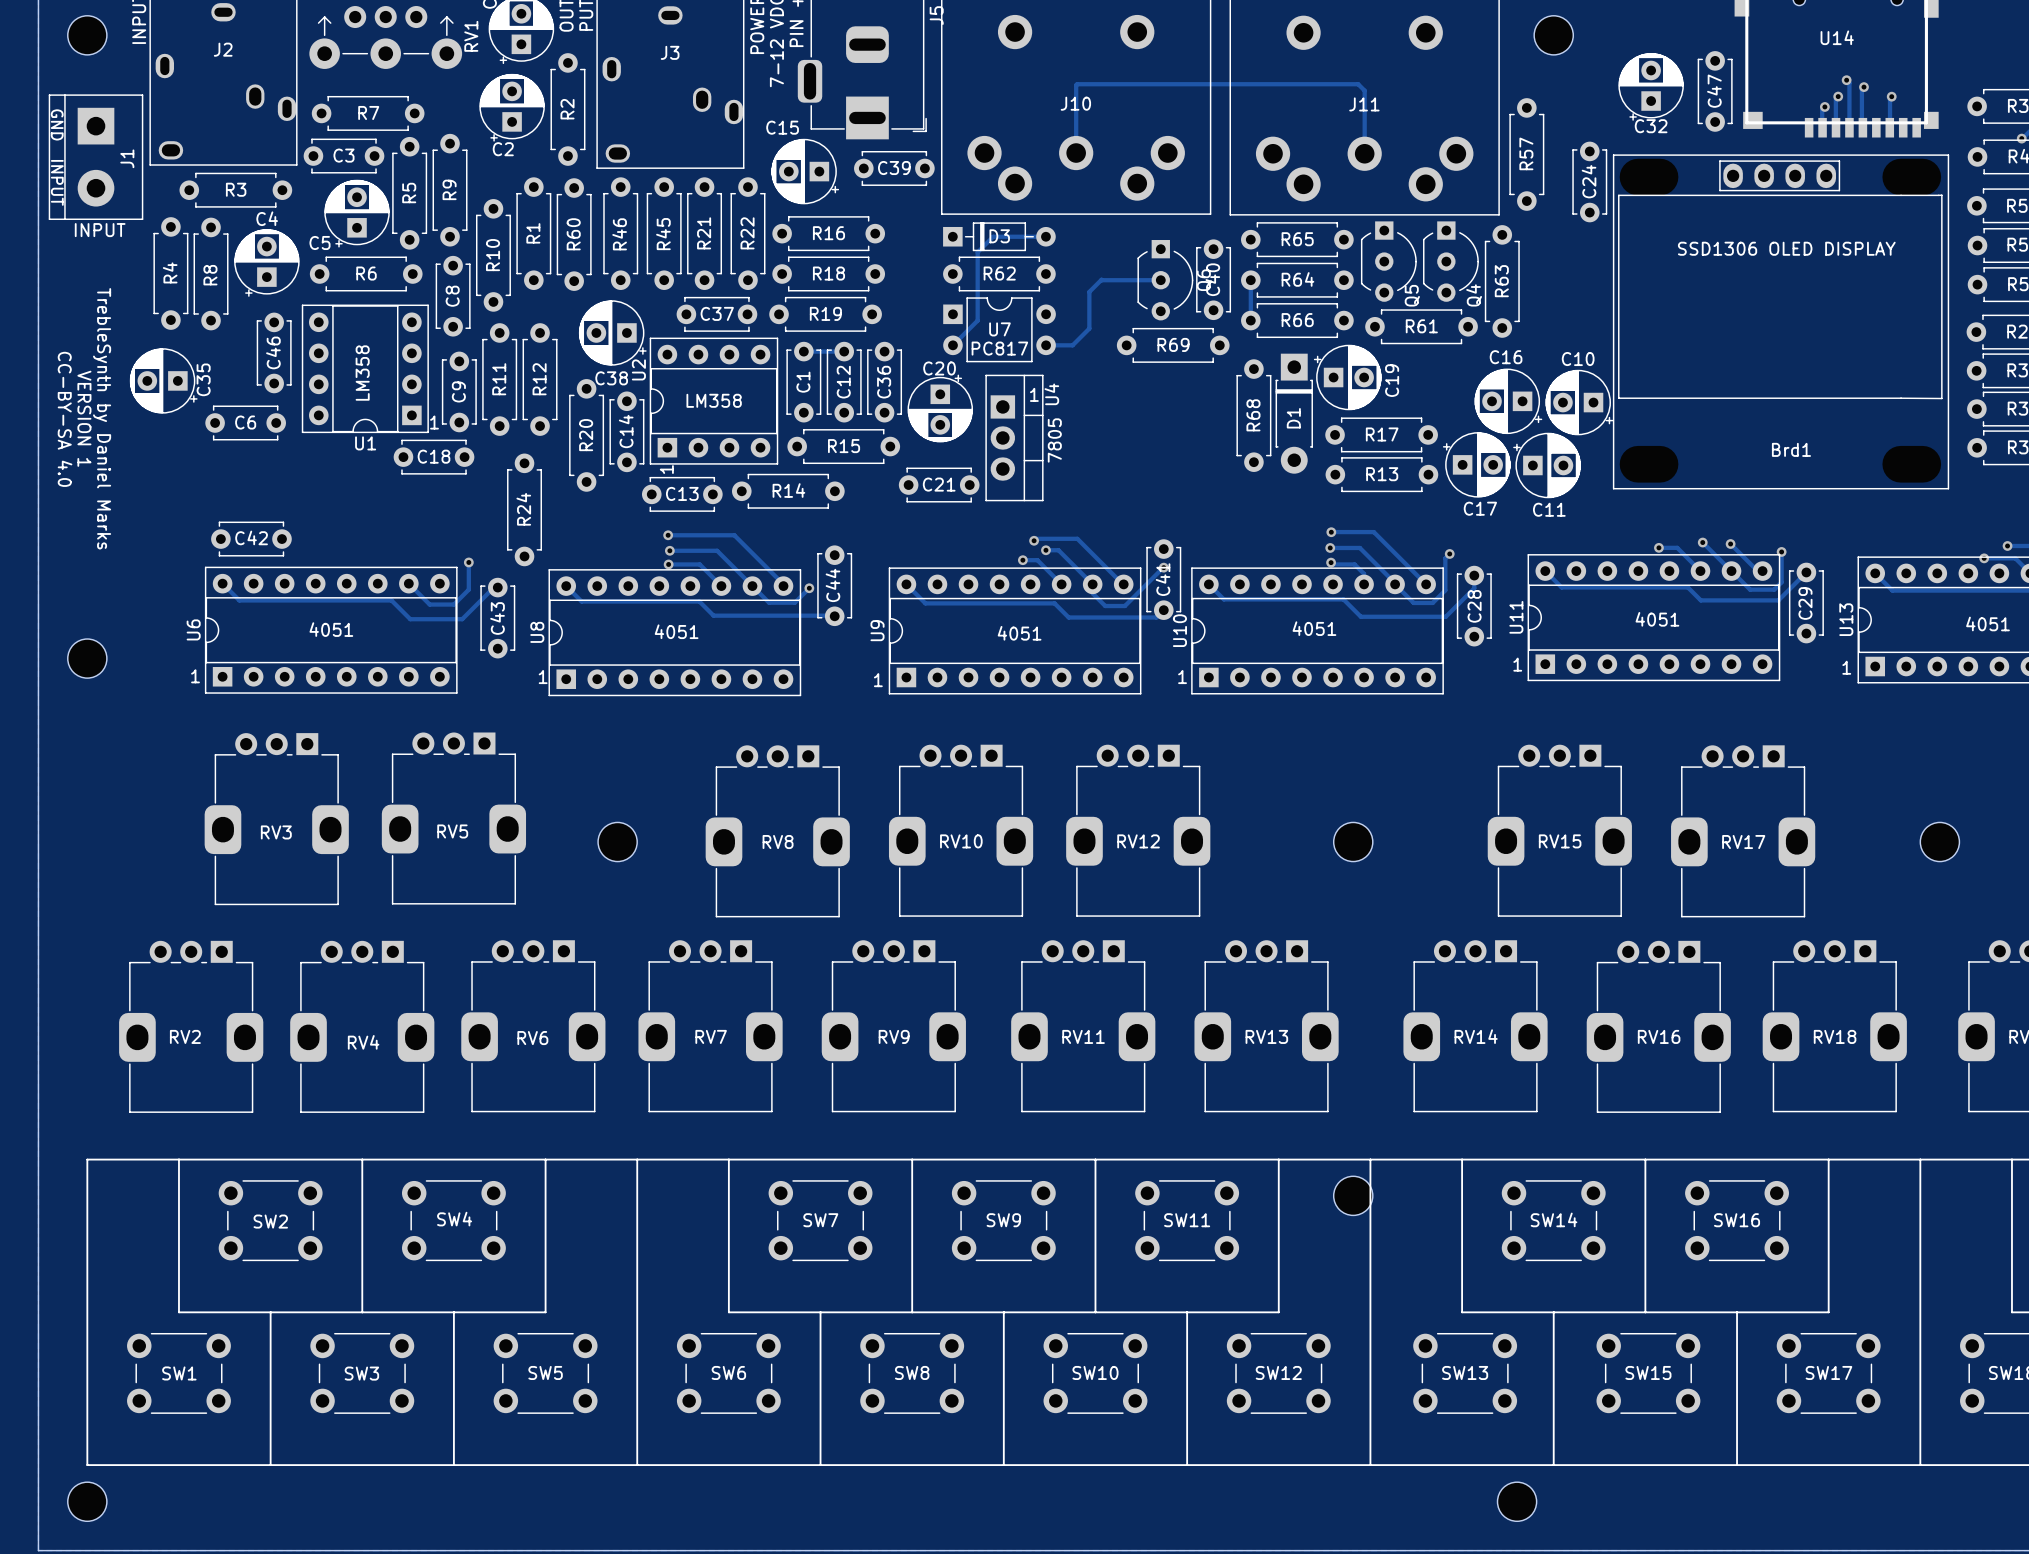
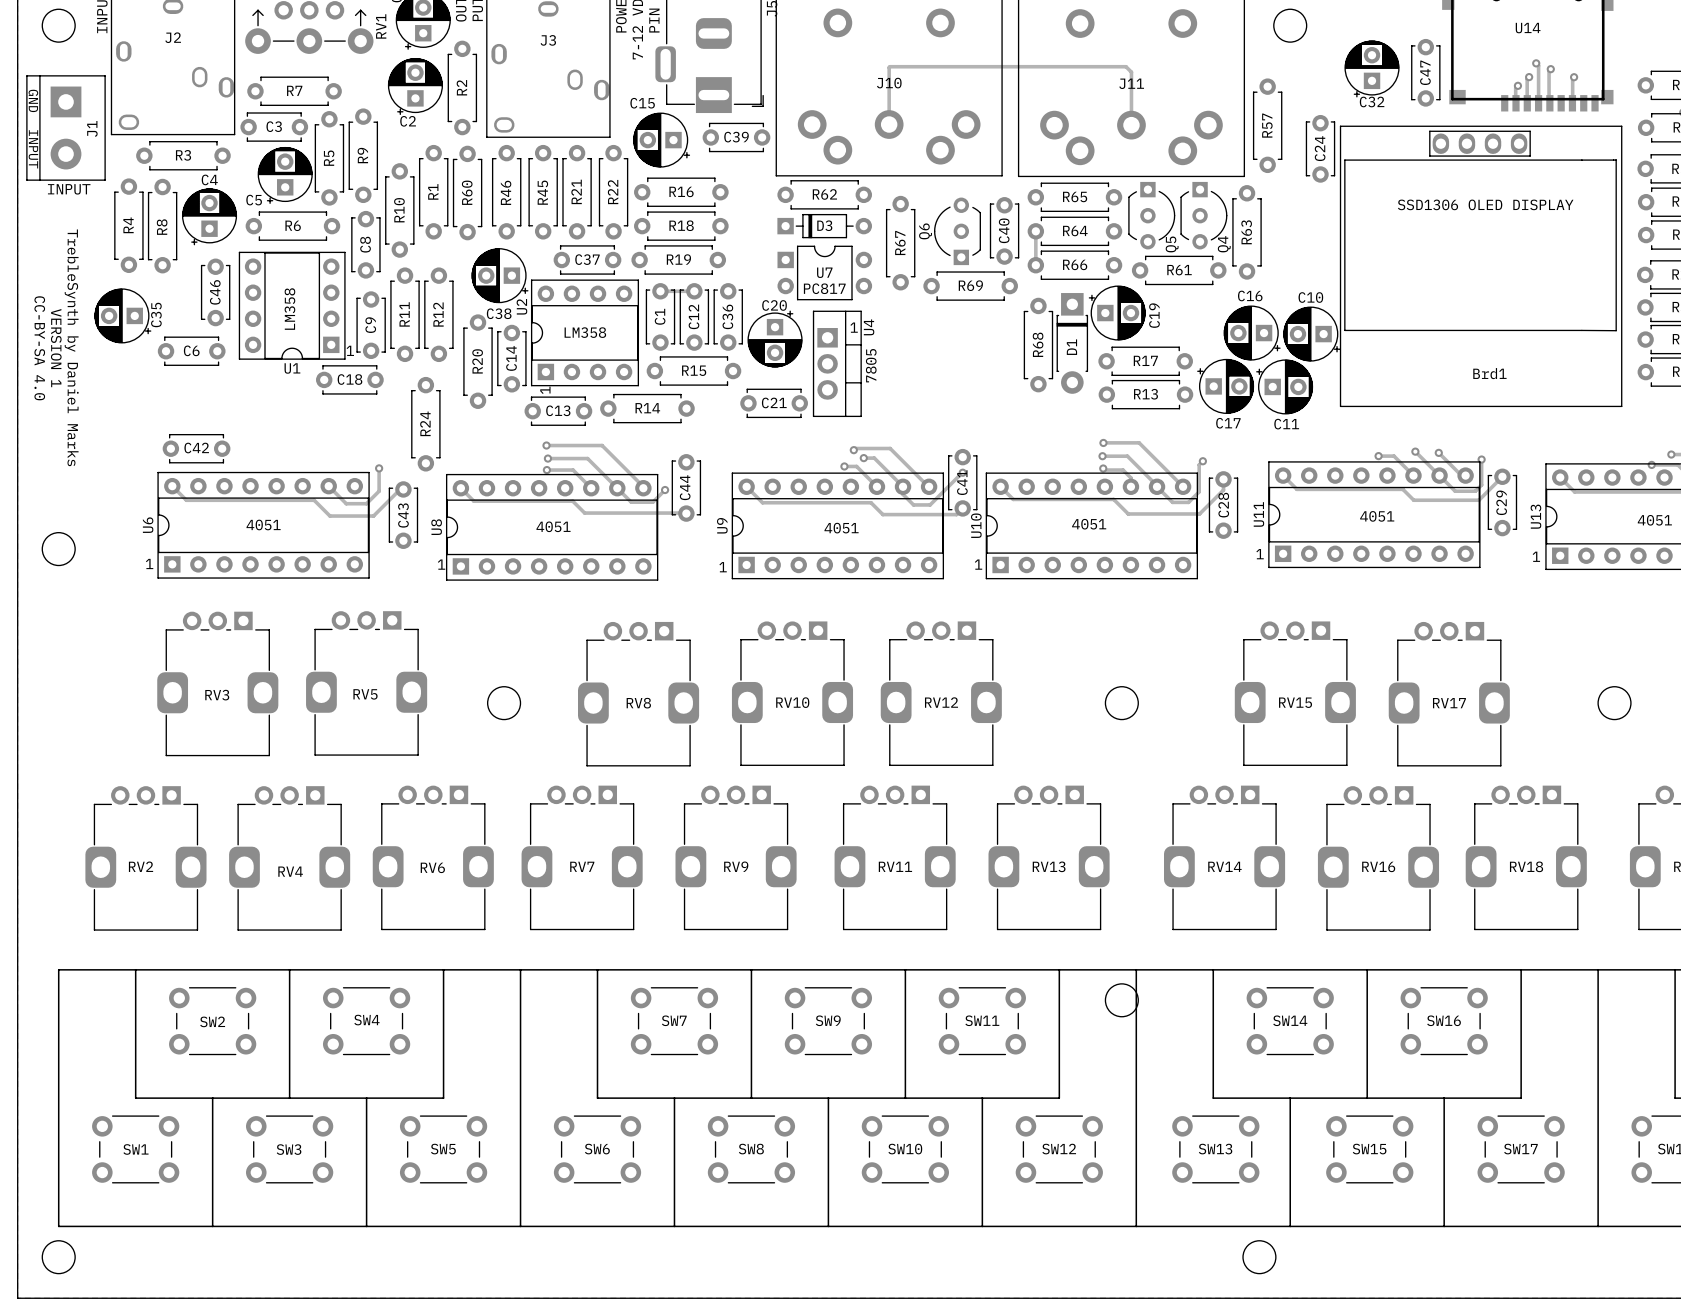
D3 position: (999, 236) -> (824, 226)
track: (1045, 236) (993, 236) (977, 252) (977, 320) (952, 345) -> none
R62 position: (999, 274) -> (824, 194)
track: (1160, 280) (1101, 279) (1089, 291) (1089, 328) (1072, 345) (1046, 345) -> none
Q6 rotation: 0° (1165, 280) -> 180° (957, 231)
R67: none -> (900, 243)

